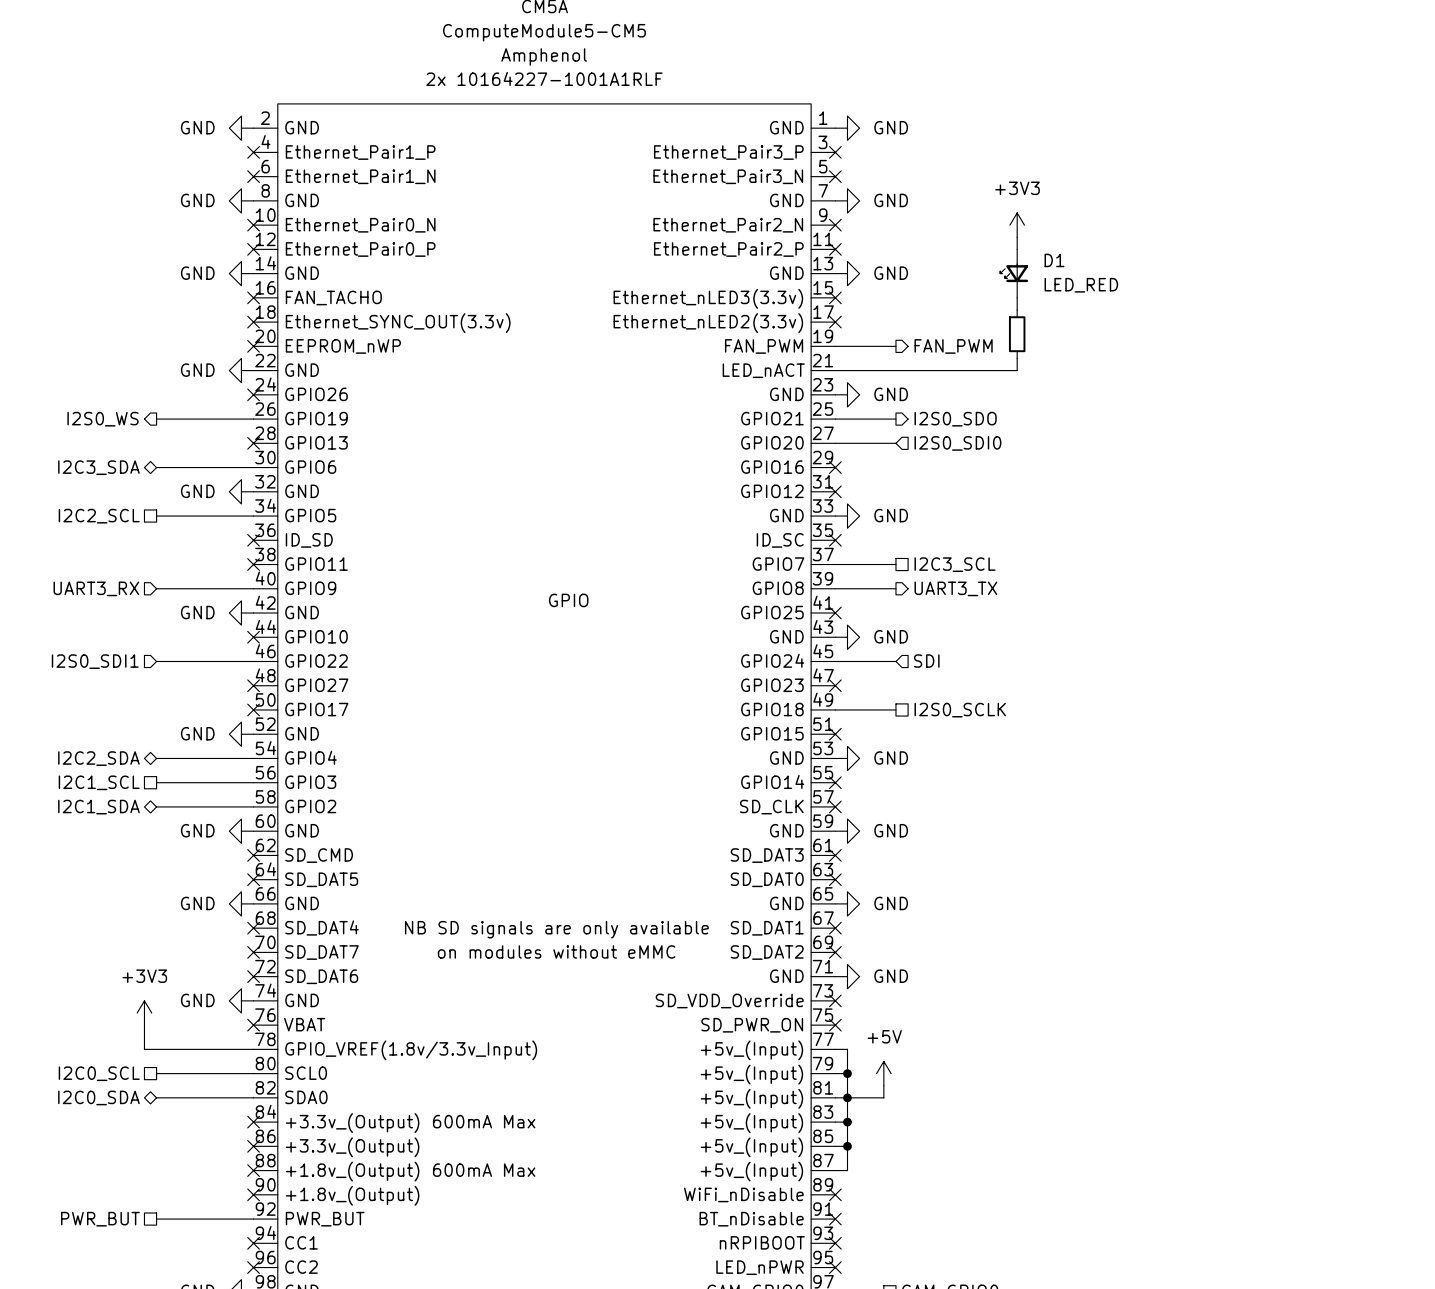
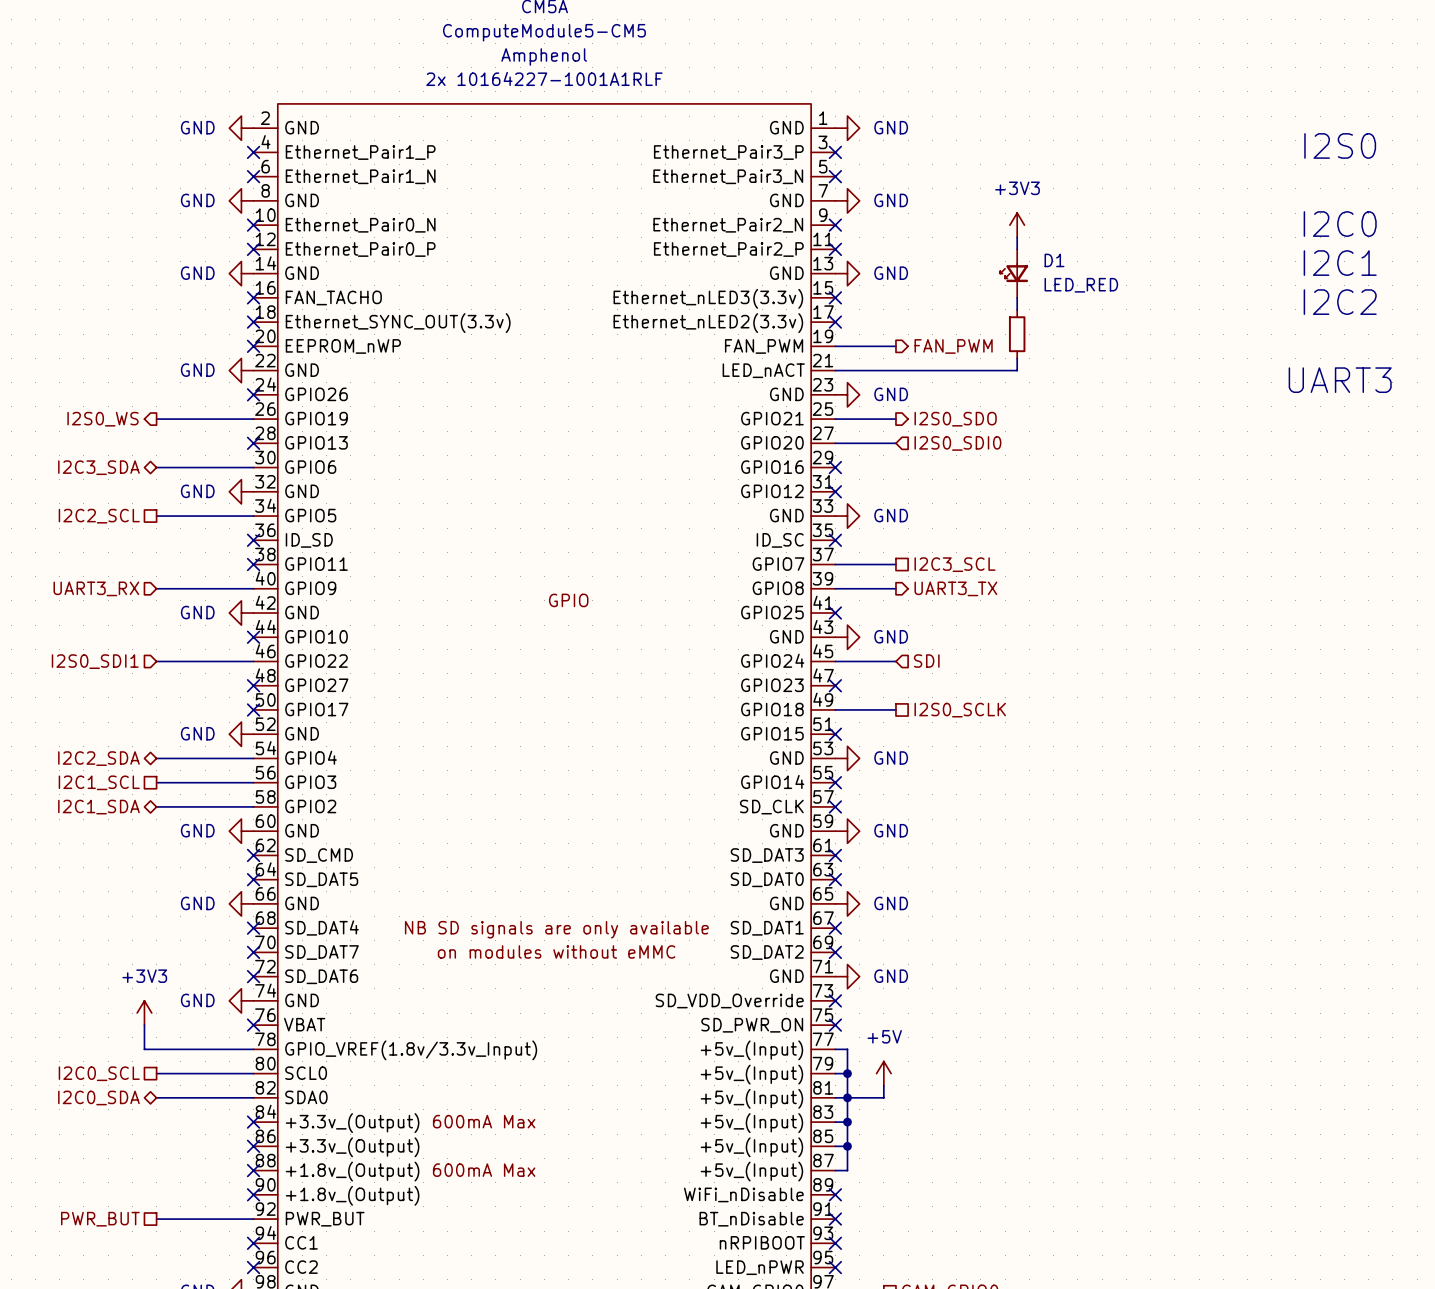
text: none -> I2S0 (1340, 145)
text: none -> I2C0 (1340, 224)
text: none -> I2C1 (1340, 263)
text: none -> I2C2 (1340, 302)
text: none -> UART3 (1340, 380)

